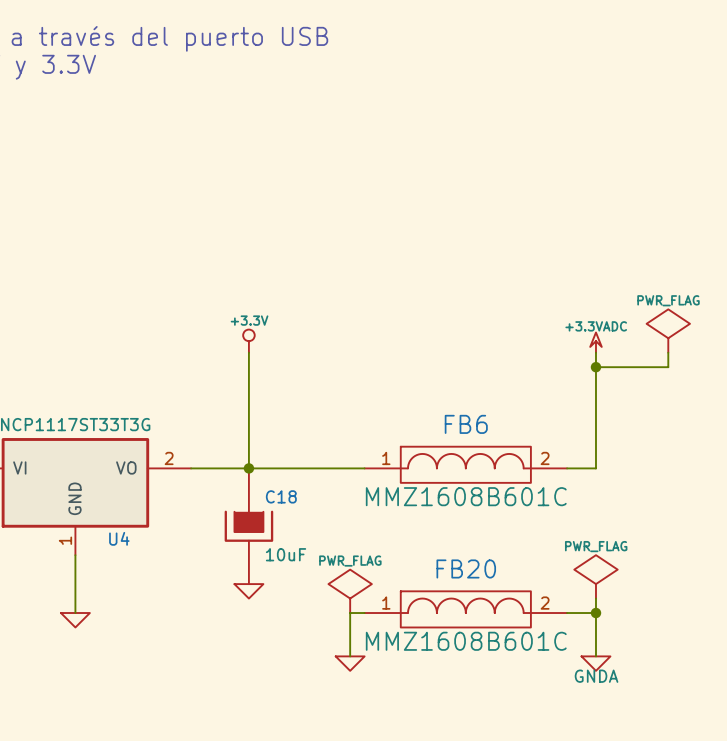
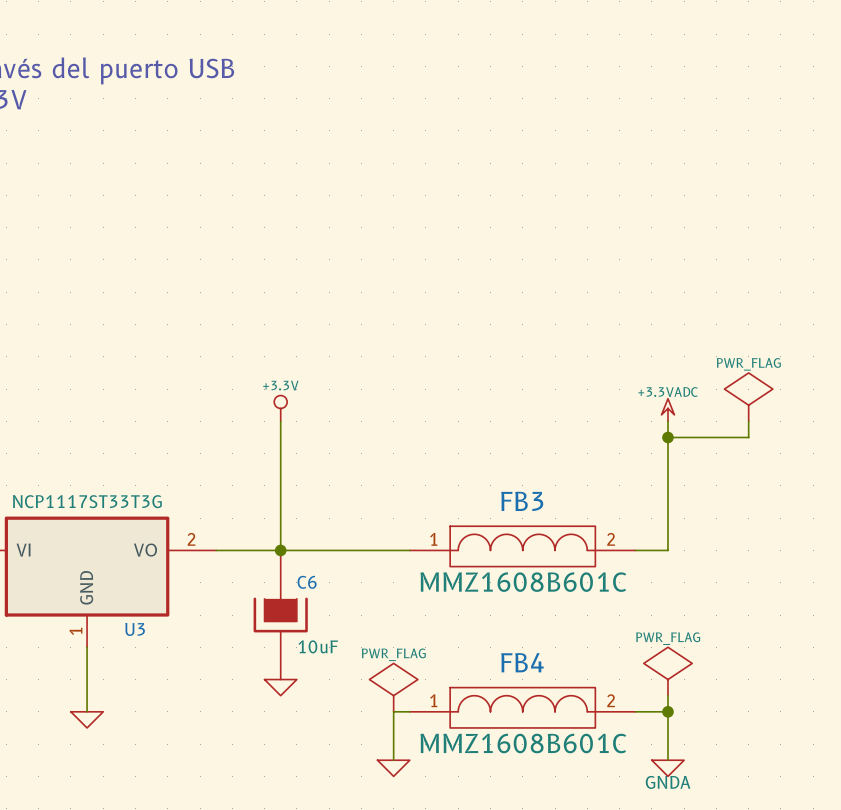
FB6 name: FB6 (466, 424) -> FB3 (522, 501)
C18 name: C18 (281, 496) -> C6 (307, 582)
U4 name: U4 (119, 538) -> U3 (135, 629)
FB20 name: FB20 (466, 568) -> FB4 (522, 662)

